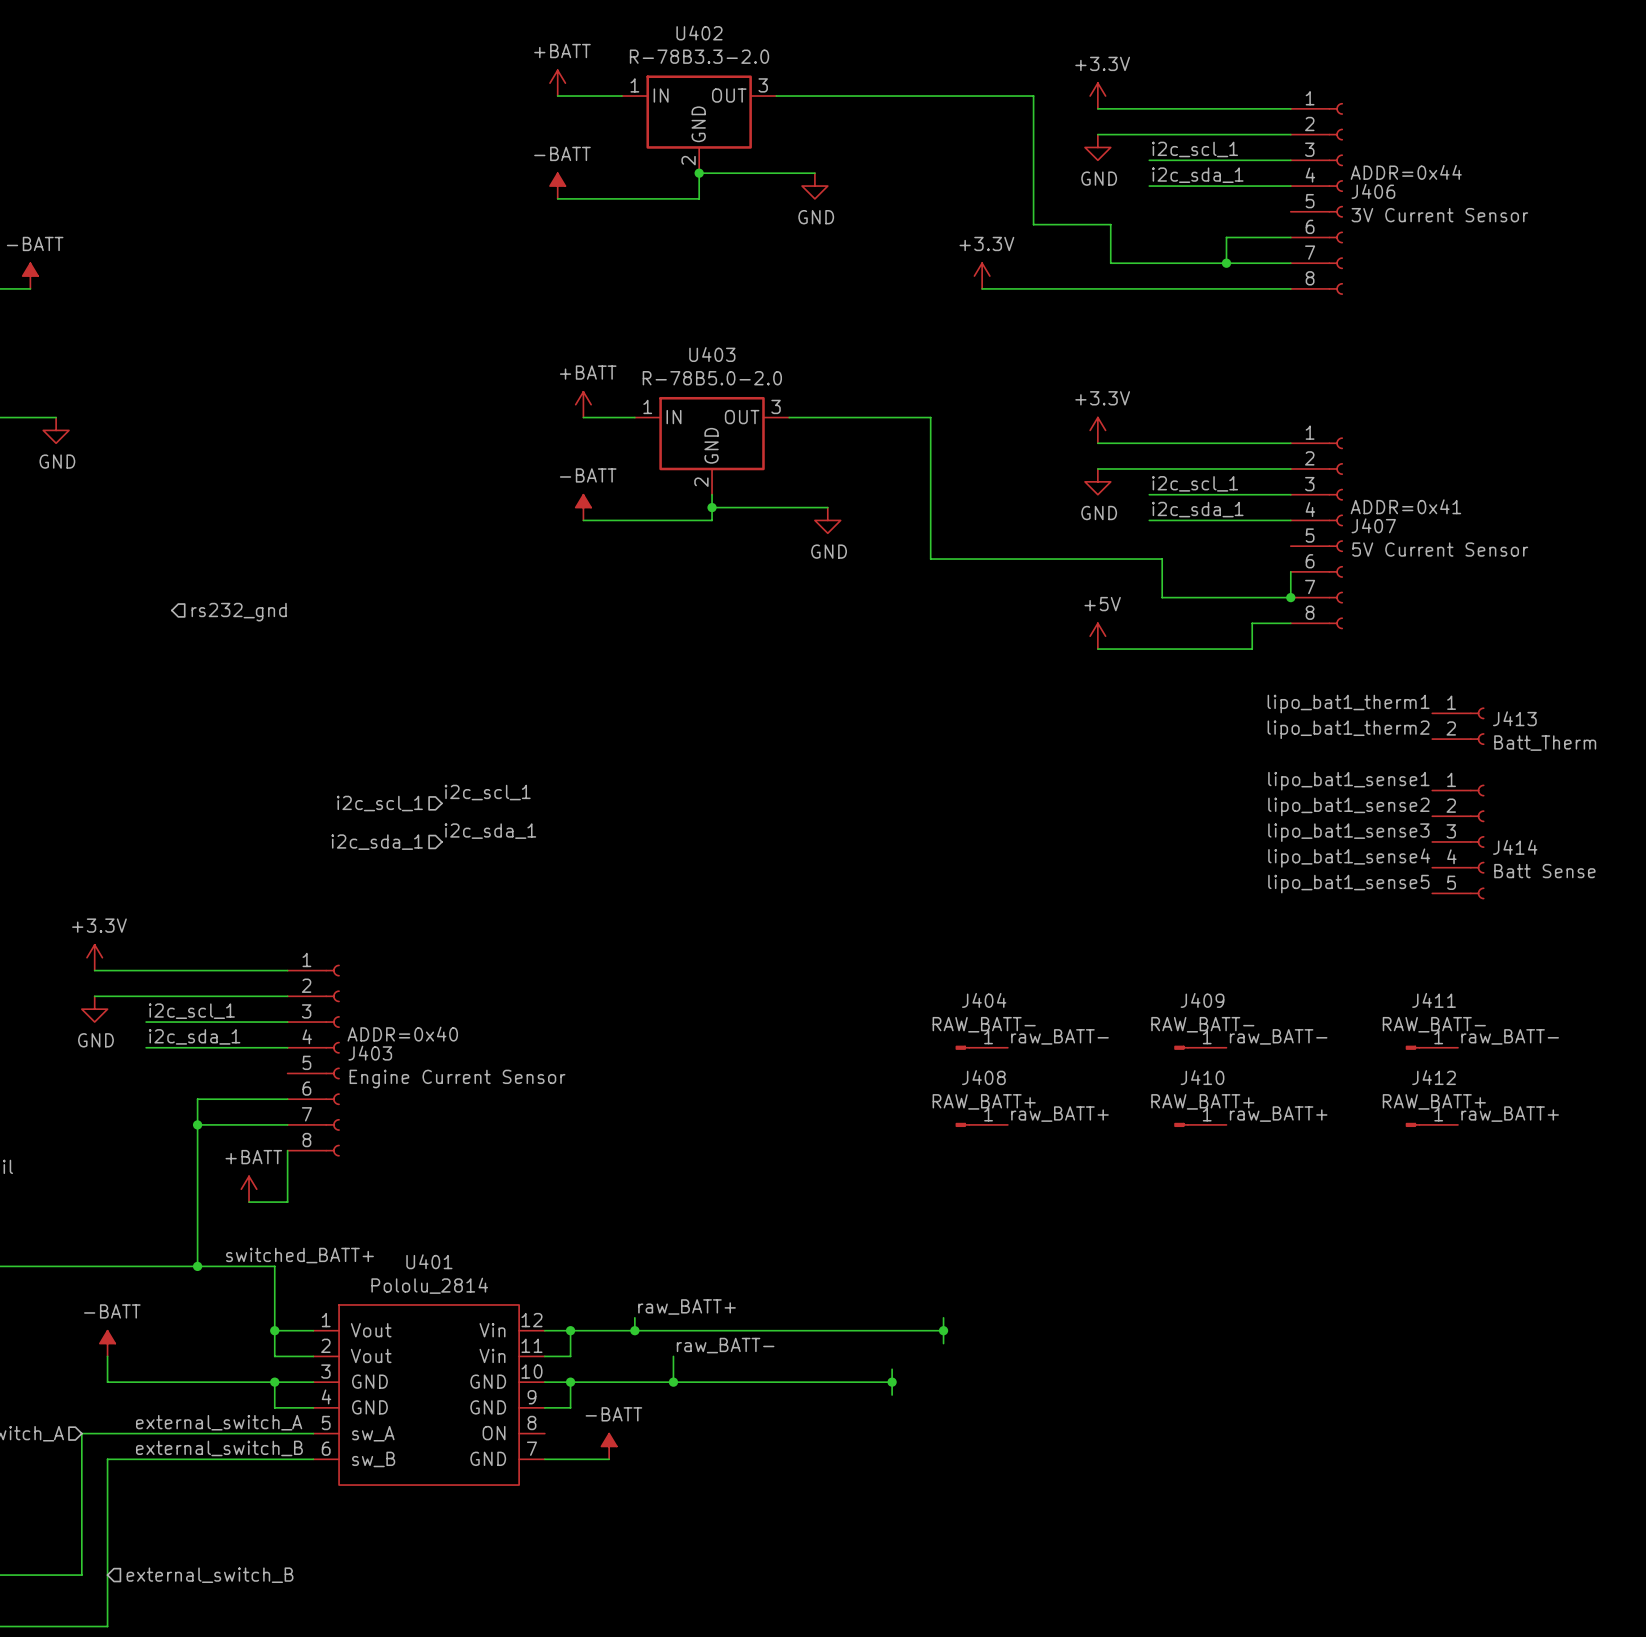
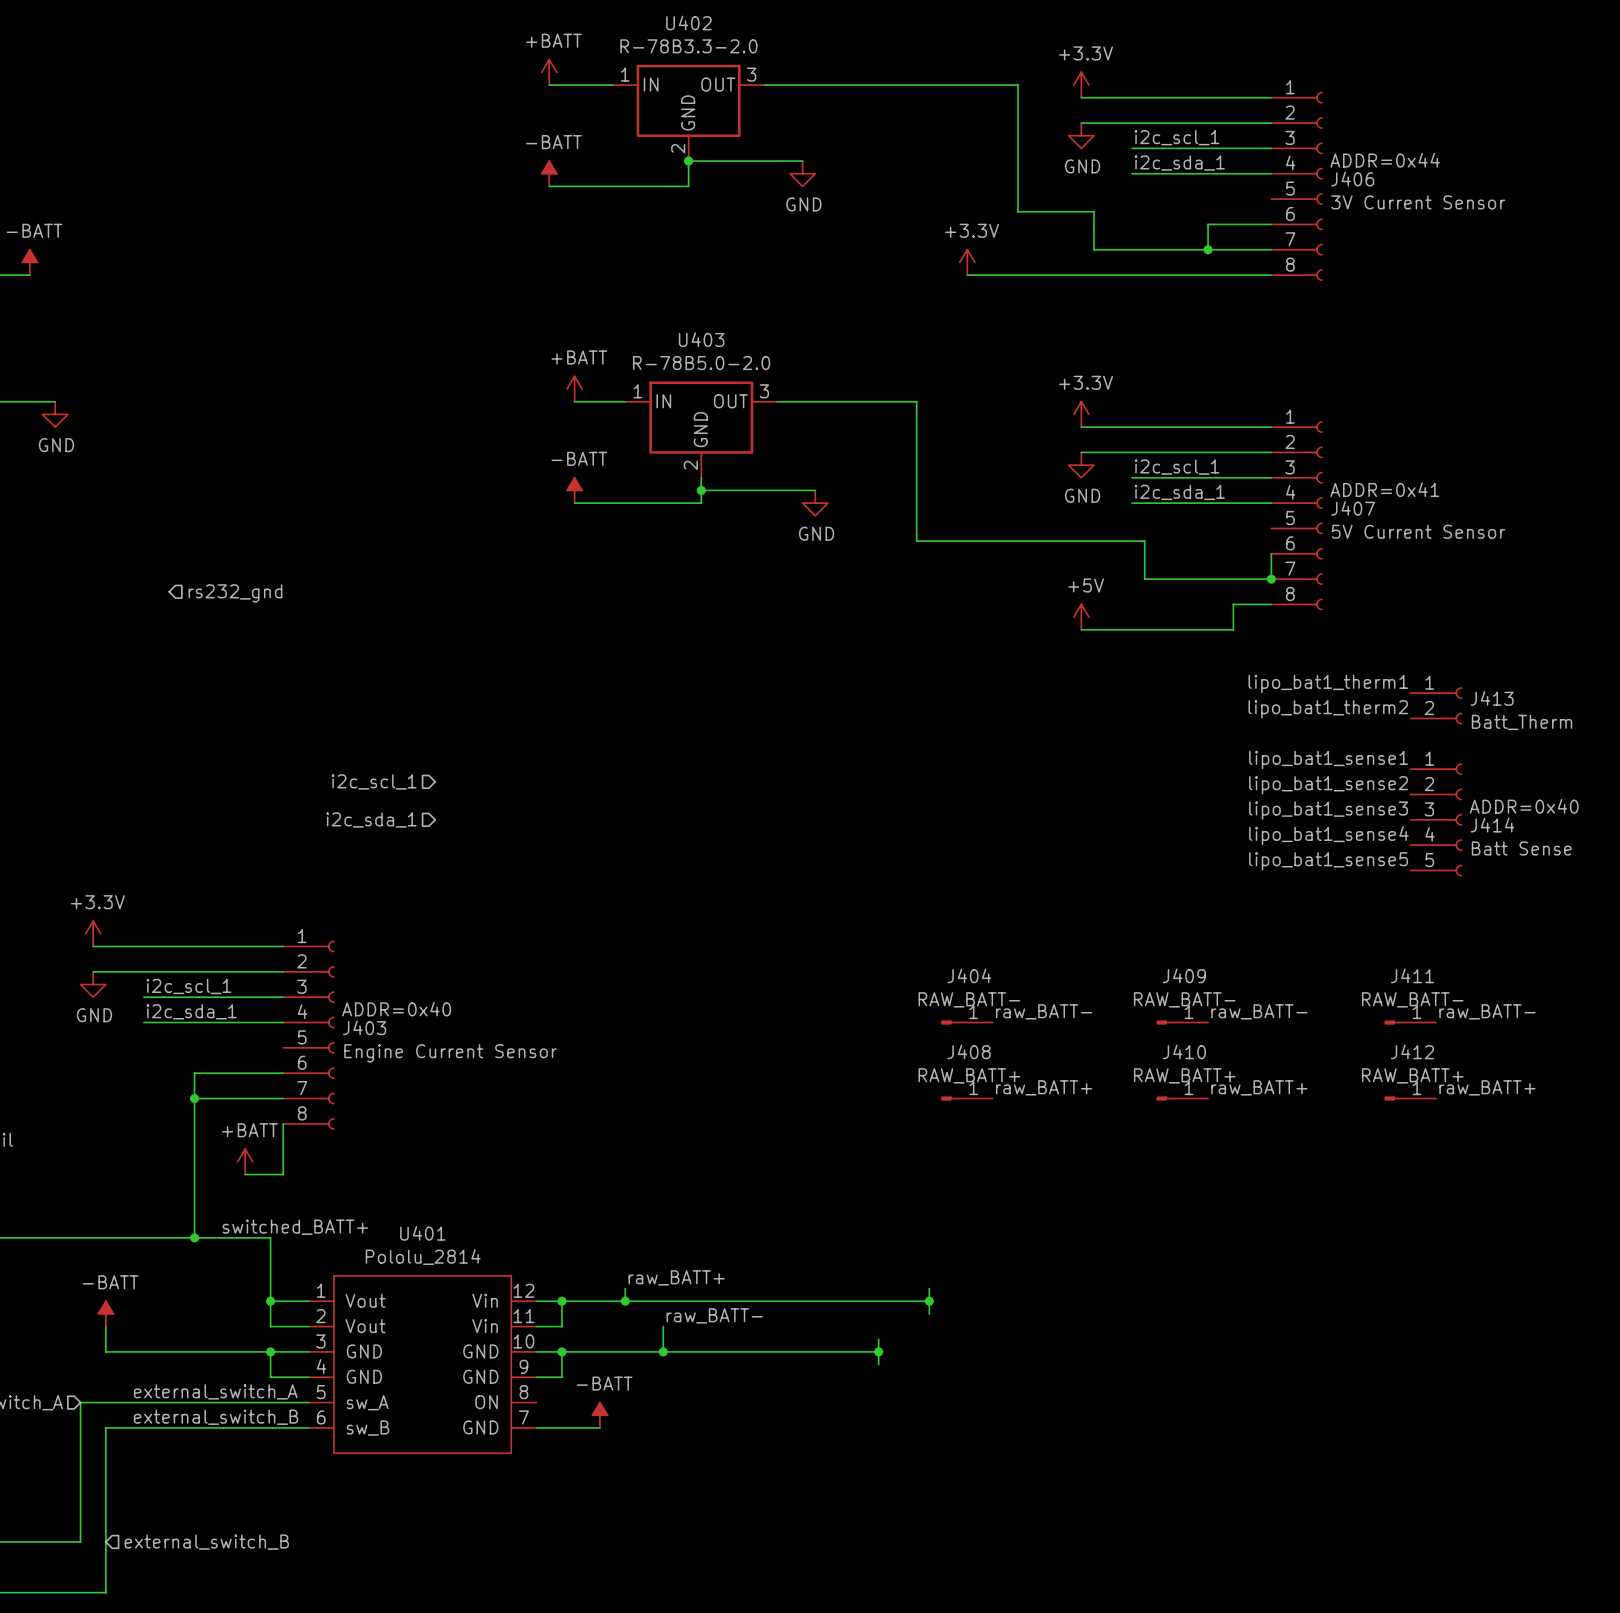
label: i2c_scl_1 (487, 792) -> none
J414 text: none -> ADDR=0x40 (1524, 806)
label: i2c_sda_1 (490, 831) -> none

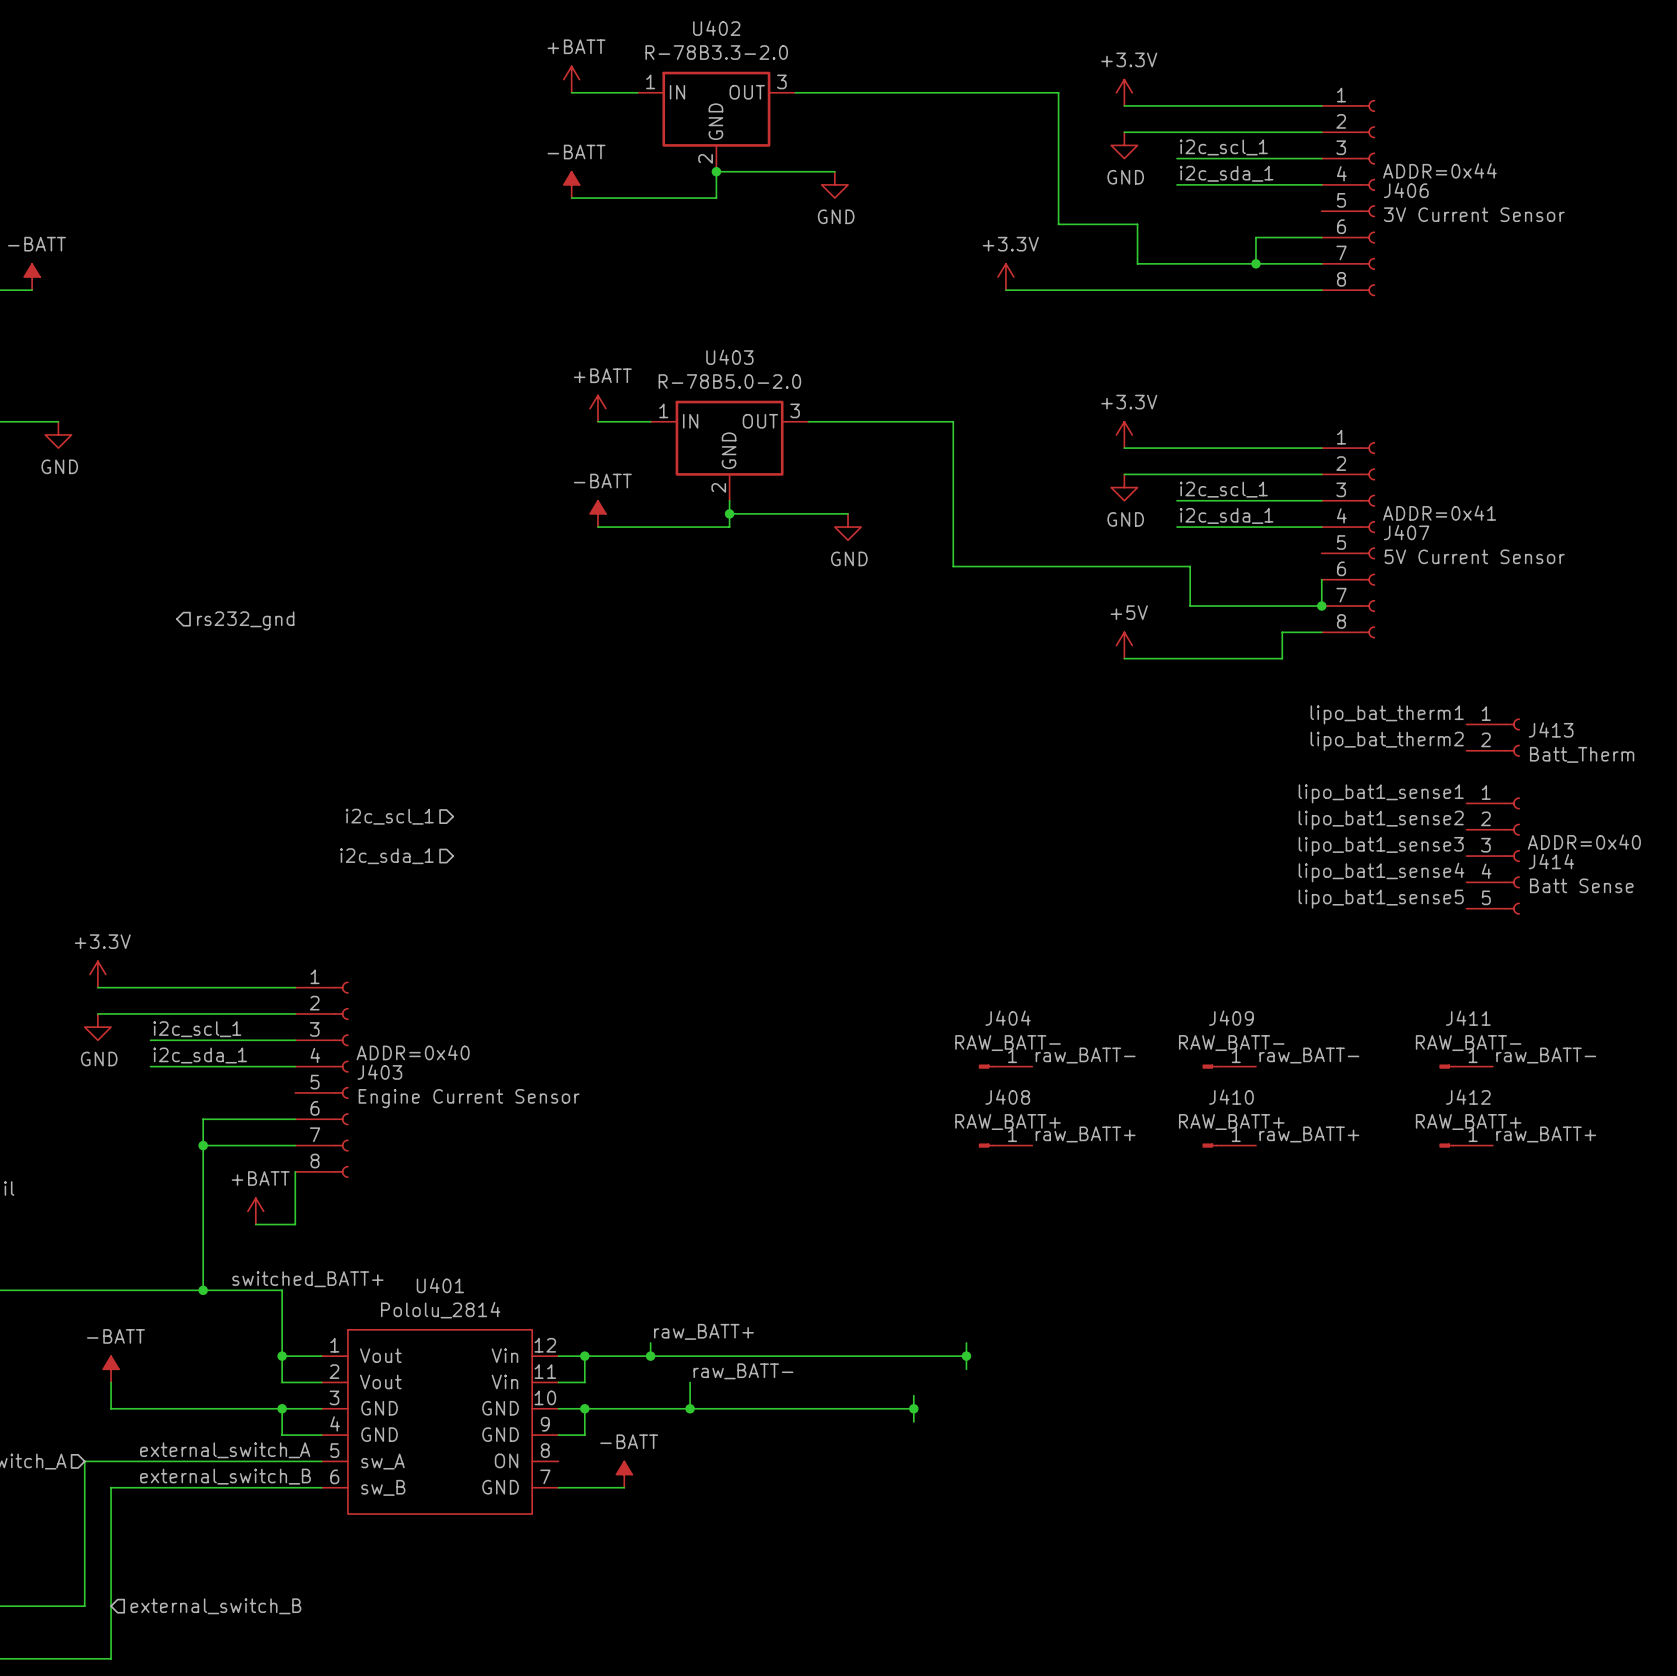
label: lipo_bat1_therm1 (1328, 683) -> lipo_bat_therm1 (1387, 714)
label: lipo_bat1_therm2 (1328, 709) -> lipo_bat_therm2 (1387, 741)

